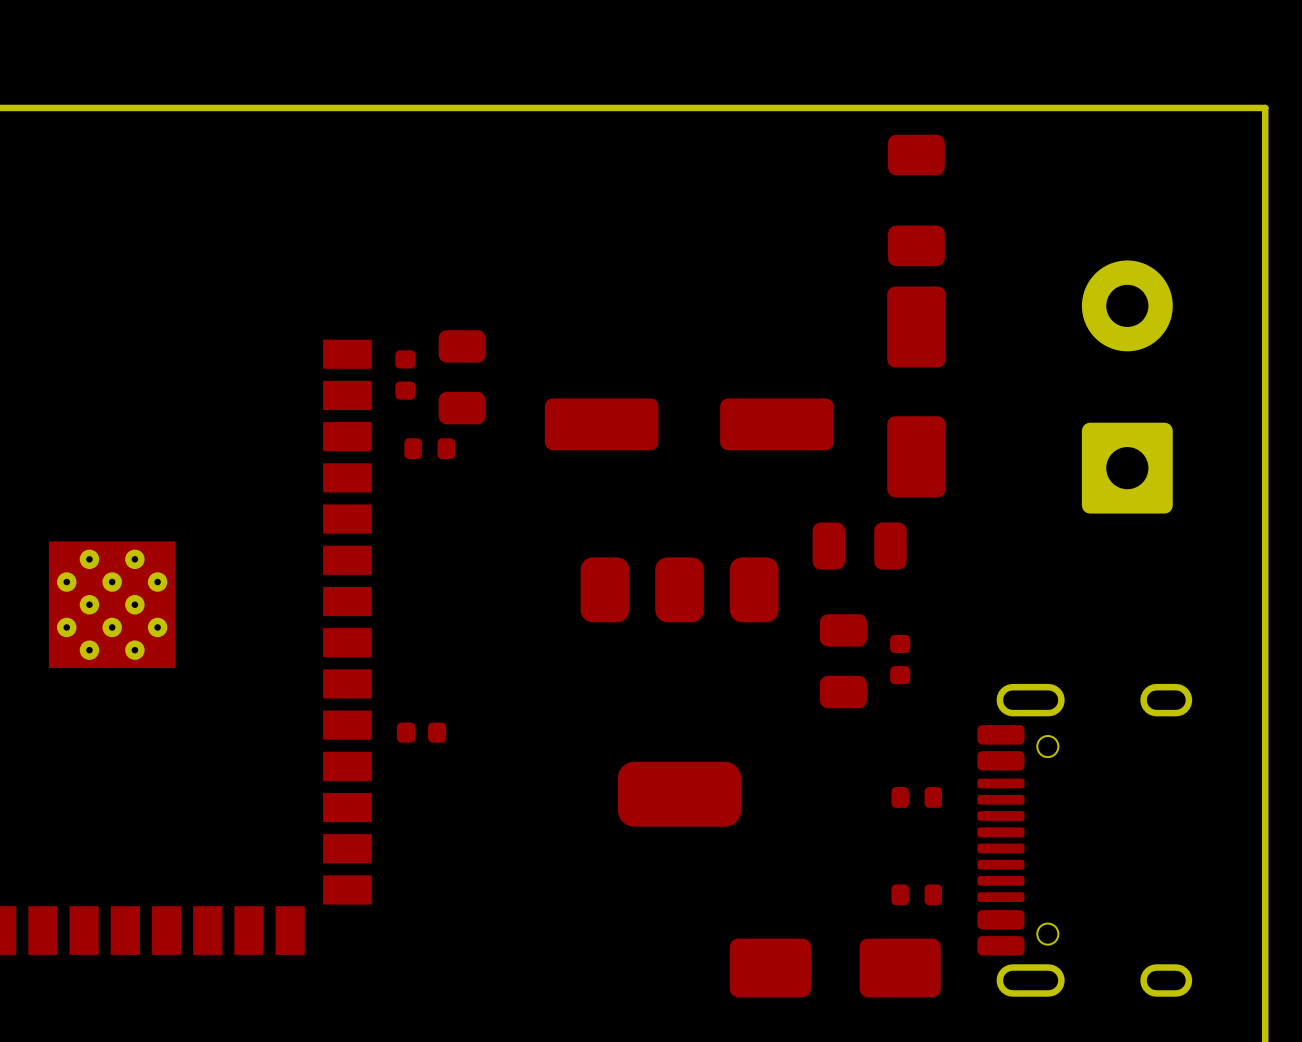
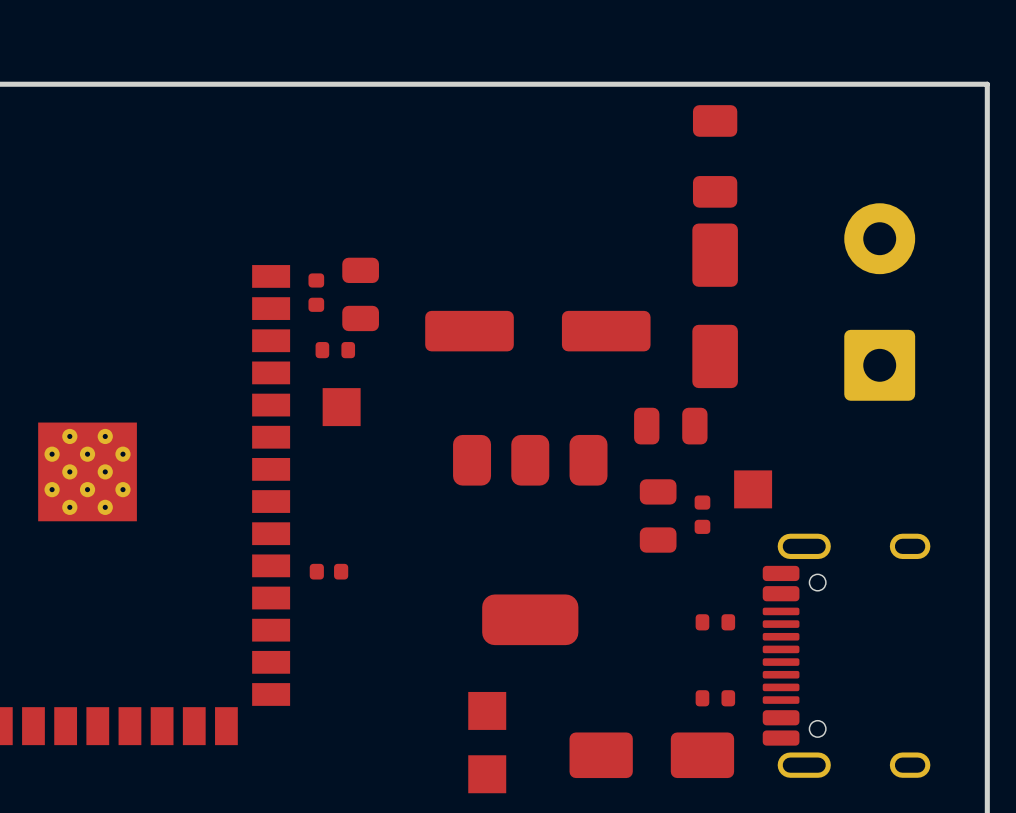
part: none -> (341, 407)
part: none -> (753, 489)
part: none -> (487, 710)
part: none -> (487, 774)

